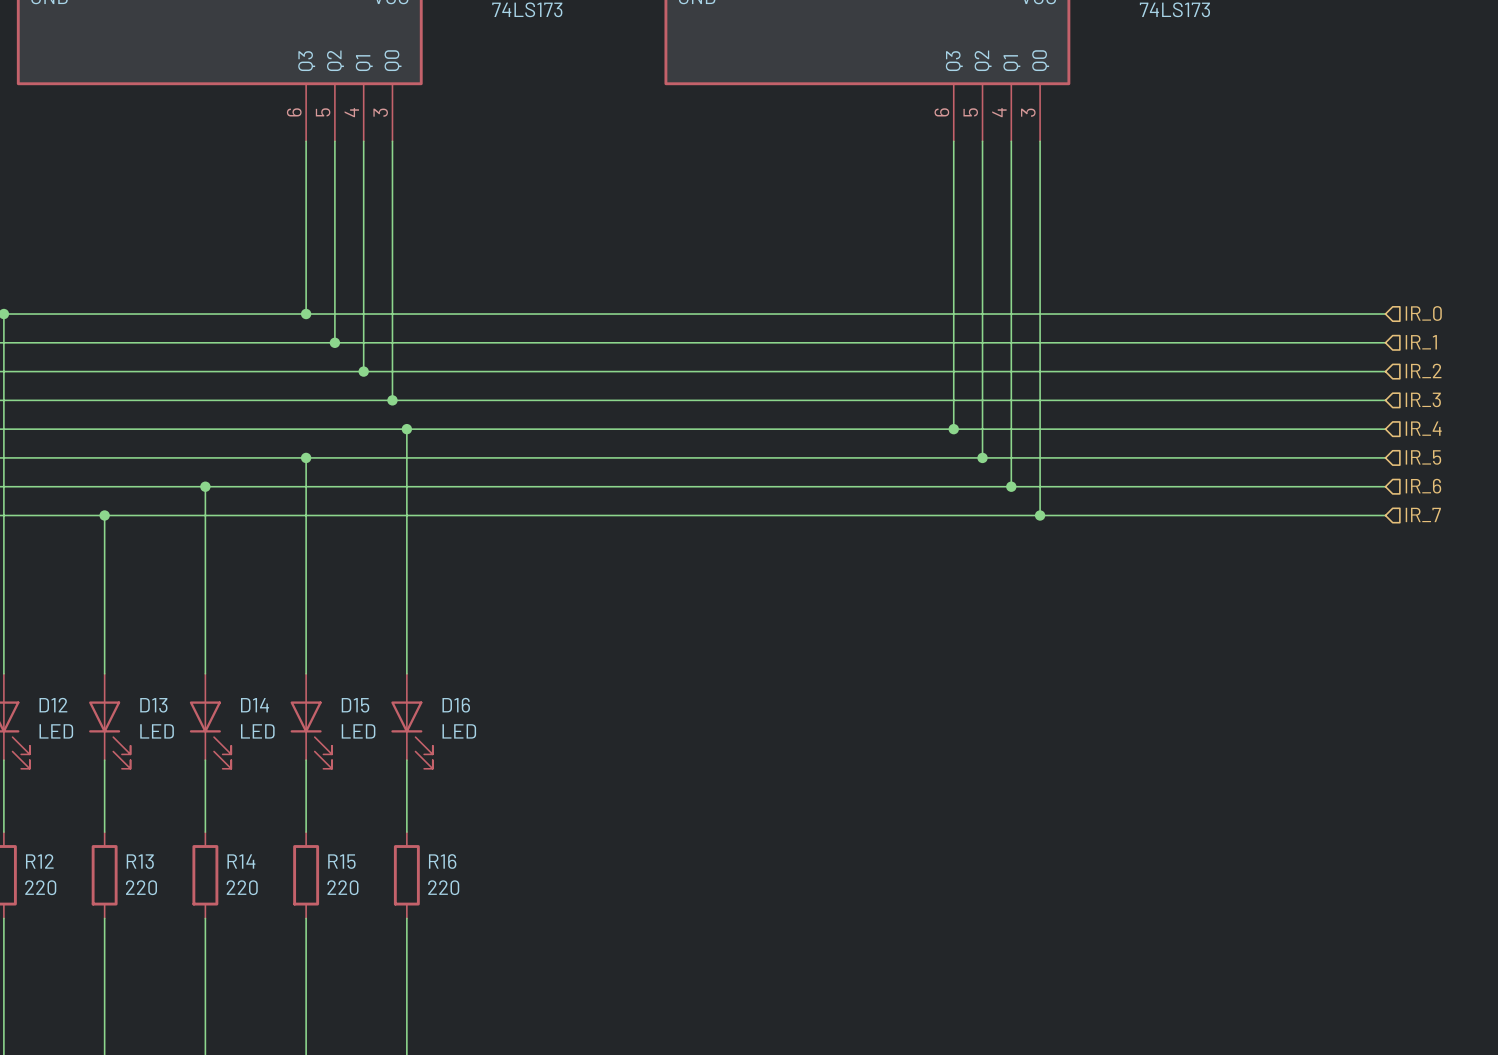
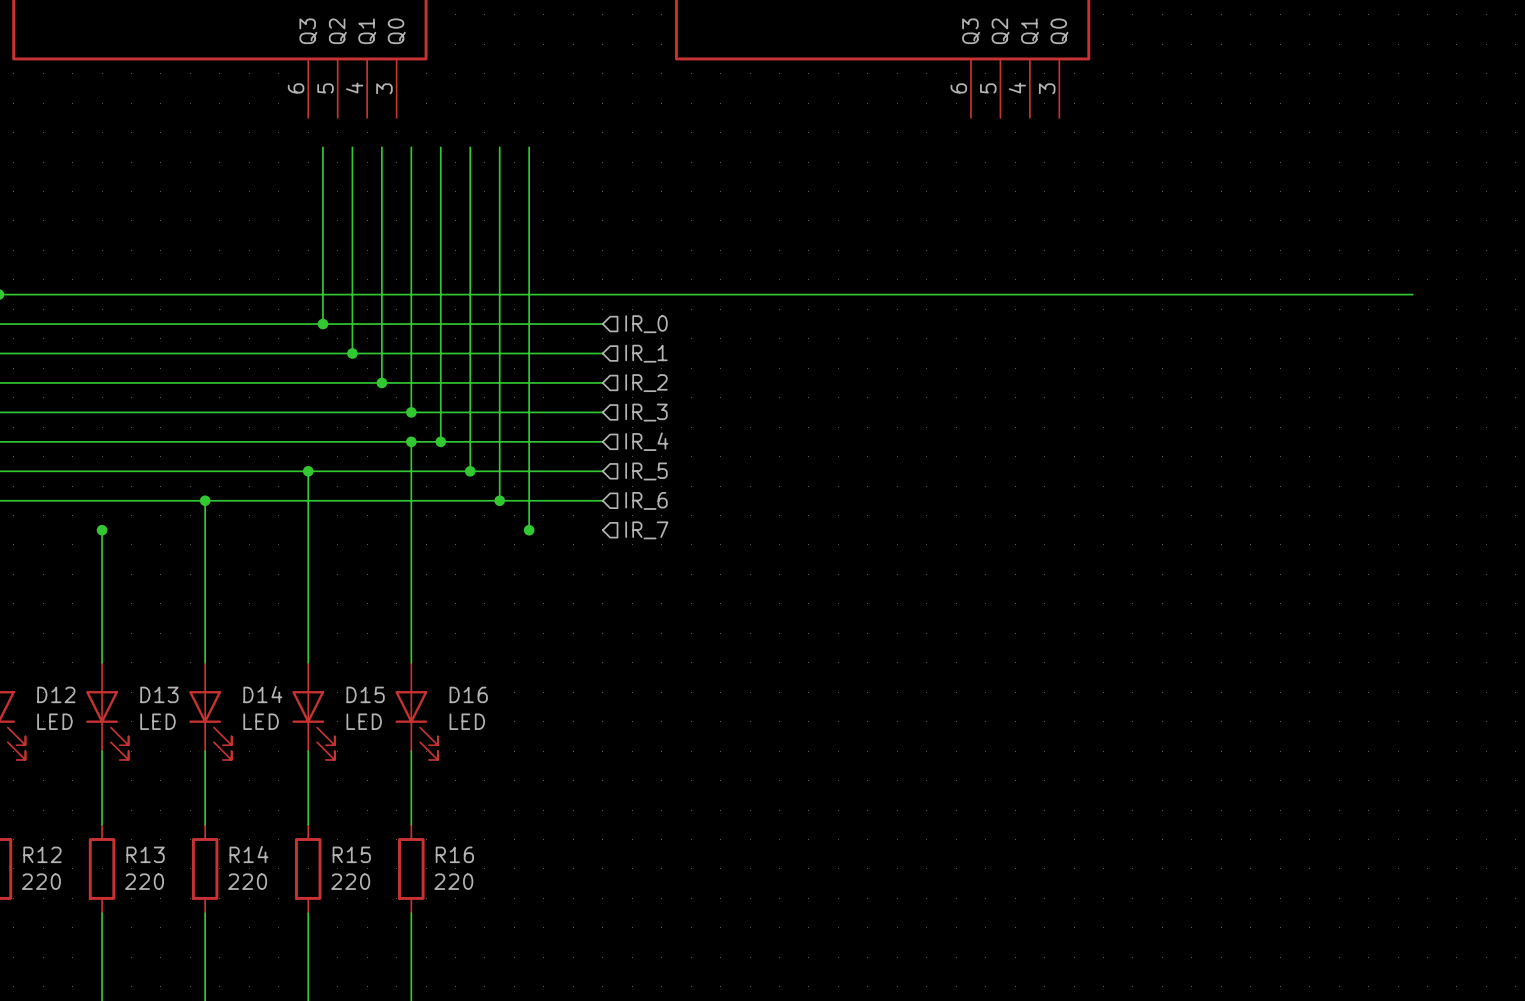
wire: (306, 141) (306, 314) -> (322, 147) (322, 324)
wire: (334, 141) (334, 342) -> (352, 147) (352, 353)
wire: (363, 141) (363, 371) -> (381, 147) (381, 382)
wire: (392, 141) (392, 400) -> none
wire: (953, 141) (953, 429) -> none
wire: (982, 141) (982, 457) -> none
wire: (1011, 141) (1011, 486) -> none
wire: (1040, 141) (1040, 515) -> none
wire: none -> (440, 147) (440, 441)
wire: none -> (470, 147) (470, 471)
wire: none -> (499, 147) (499, 500)
wire: none -> (529, 147) (529, 530)
hierarchical label: IR_0 (1423, 313) -> none
junction: (306, 314) -> none
junction position: (334, 342) -> (322, 324)
wire: (593, 342) (1385, 342) -> none
hierarchical label: none -> IR_0 (646, 324)
hierarchical label: IR_1 (1421, 342) -> none
hierarchical label: IR_2 (1423, 370) -> none
junction position: (363, 371) -> (352, 353)
wire: (593, 371) (1385, 371) -> none
hierarchical label: none -> IR_1 (646, 353)
hierarchical label: none -> IR_2 (646, 383)
hierarchical label: IR_3 (1423, 399) -> none
junction position: (392, 400) -> (381, 382)
wire: (593, 400) (1385, 400) -> none
hierarchical label: none -> IR_3 (646, 412)
hierarchical label: IR_4 (1423, 428) -> none
wire: (406, 429) (406, 457) -> (411, 412) (411, 147)
wire: (593, 429) (1385, 429) -> none
junction: (953, 429) -> none
wire: (306, 457) (306, 486) -> none
junction position: (306, 457) -> (308, 471)
junction: none -> (411, 441)
junction: none -> (440, 441)
wire: (593, 457) (1385, 457) -> none
hierarchical label: none -> IR_4 (646, 441)
junction: (982, 457) -> none
hierarchical label: IR_5 (1423, 457) -> none
wire: (205, 486) (205, 515) -> none
junction position: (205, 486) -> (205, 500)
junction: none -> (470, 471)
wire: (593, 486) (1385, 486) -> none
hierarchical label: none -> IR_5 (646, 471)
junction: (1011, 486) -> none
hierarchical label: IR_6 (1423, 486) -> none
hierarchical label: none -> IR_6 (646, 500)
hierarchical label: IR_7 (1423, 514) -> none
wire: (104, 515) (104, 544) -> none
junction position: (104, 515) -> (102, 530)
junction: none -> (499, 500)
wire: (593, 515) (1385, 515) -> none
junction: (1040, 515) -> none
hierarchical label: none -> IR_7 (646, 530)
junction: none -> (529, 530)

